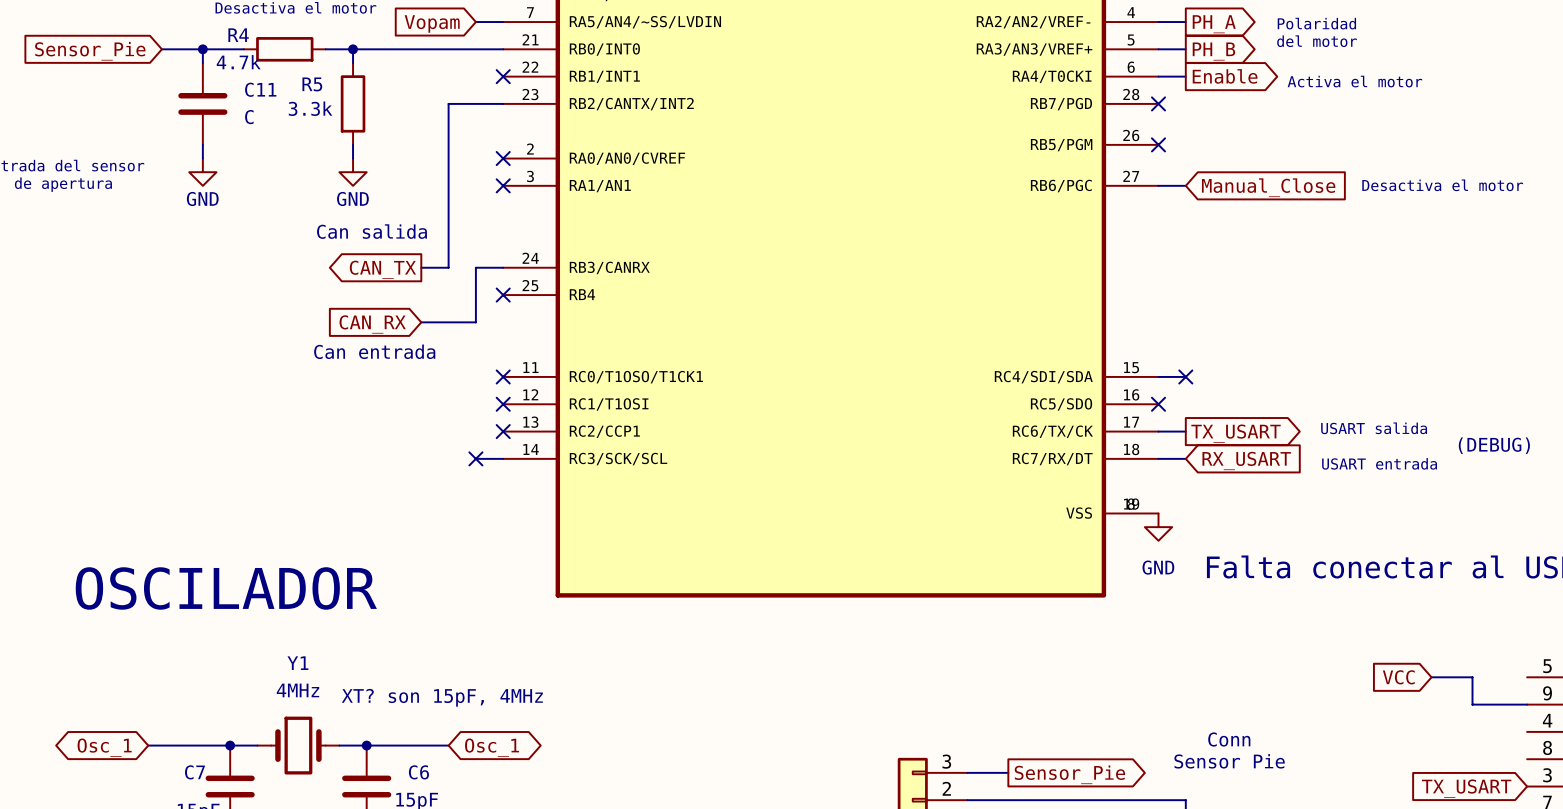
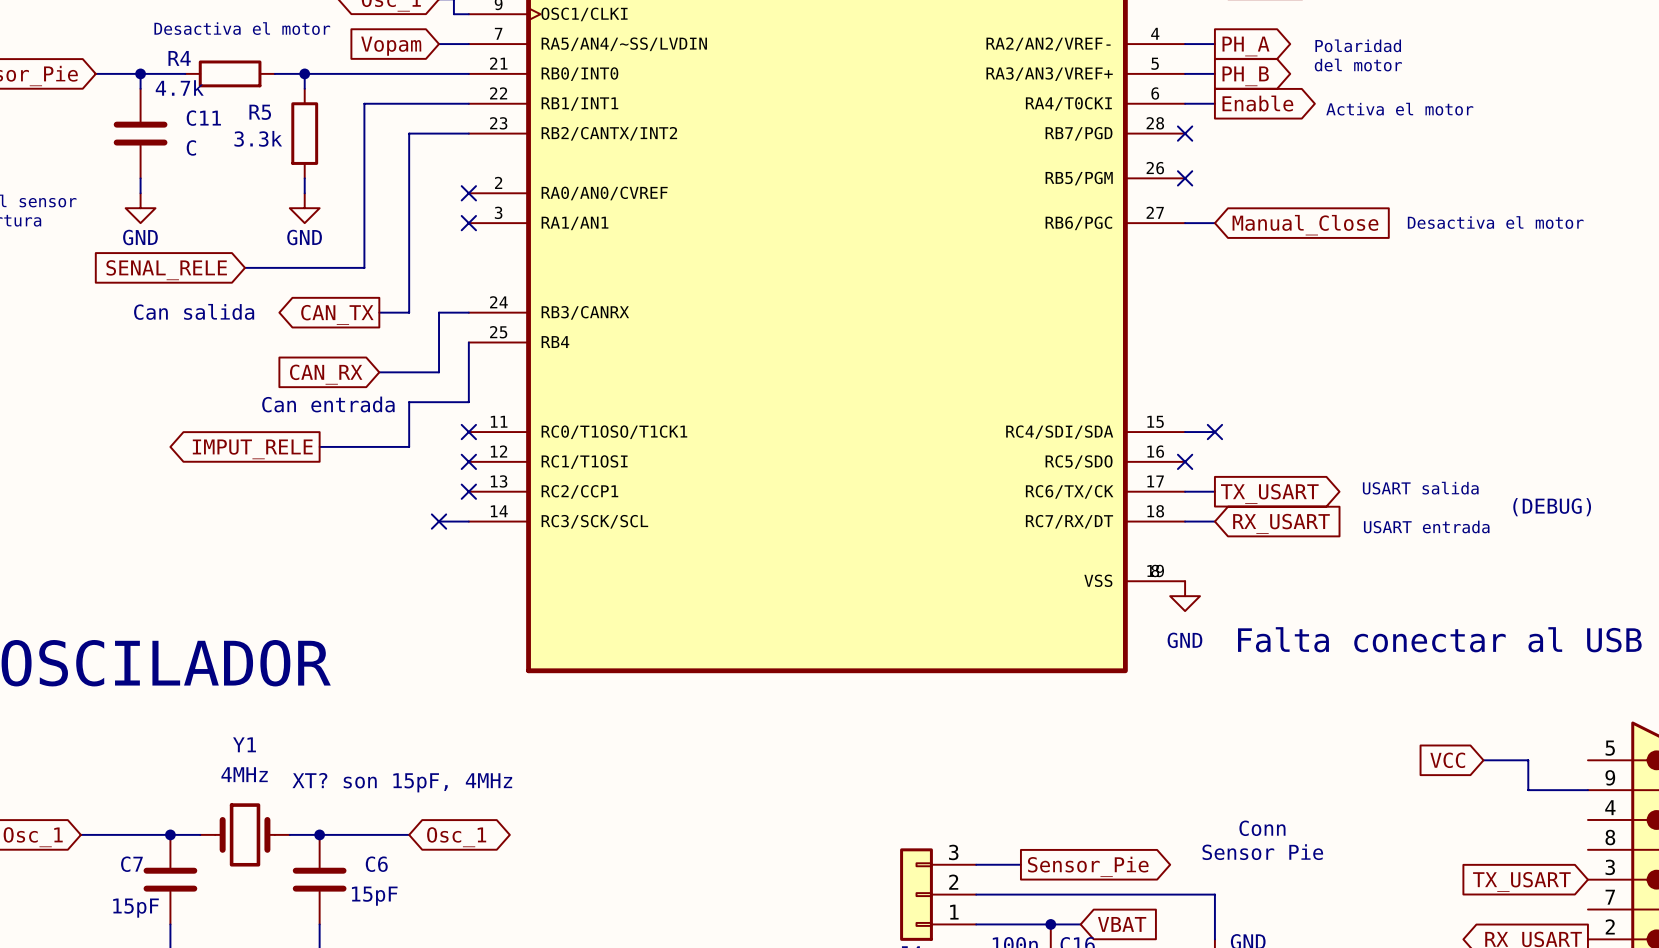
wire: none -> (468, 103) (364, 103) (364, 267) (245, 267)
no-connect mark: (503, 76) -> none
global label: none -> SENAL_RELE (166, 270)
text position: Can salida (371, 231) -> Can salida (194, 311)
wire: none -> (468, 342) (468, 402) (409, 402) (409, 446) (319, 446)
no-connect mark: (503, 295) -> none
global label: none -> IMPUT_RELE (252, 449)

